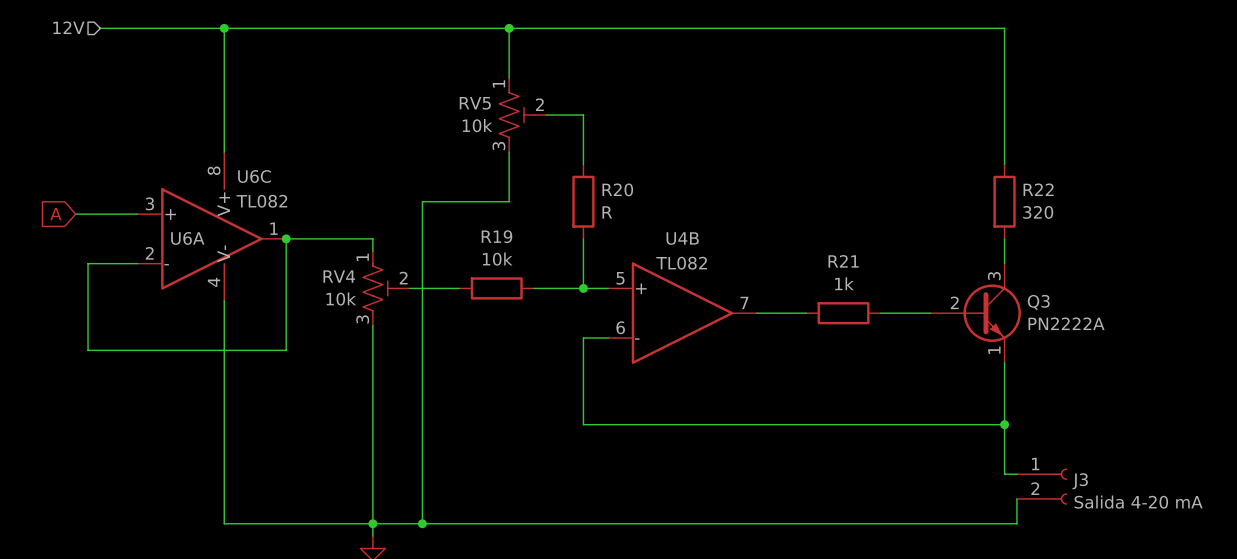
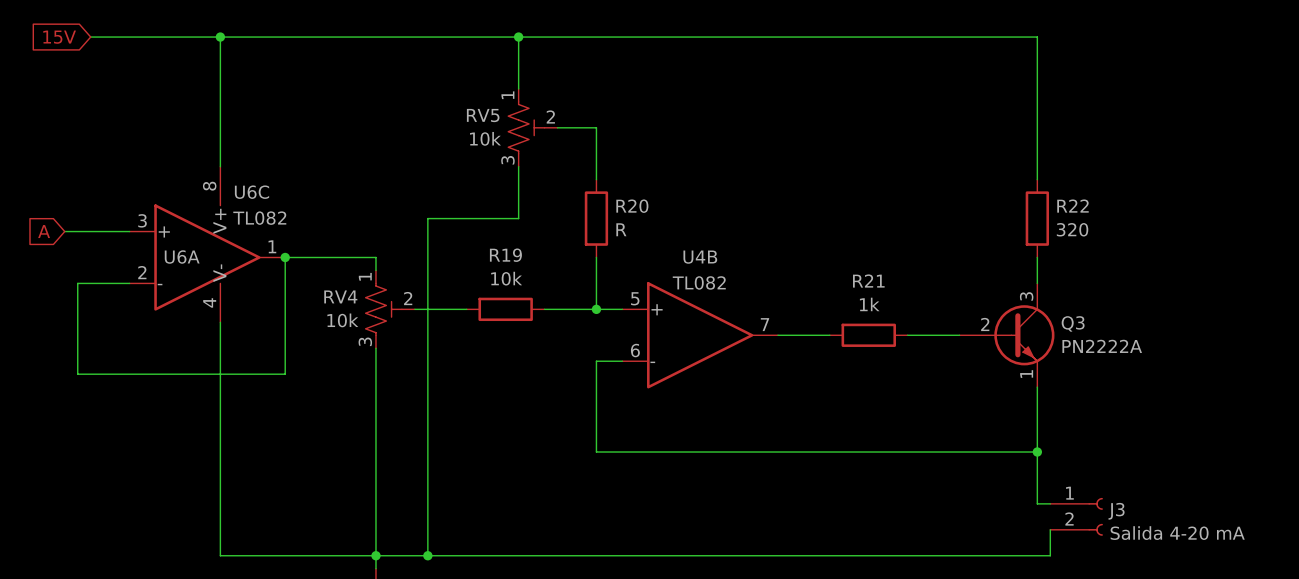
hierarchical label: 12V (68, 27) -> none
global label: none -> 15V (59, 37)

